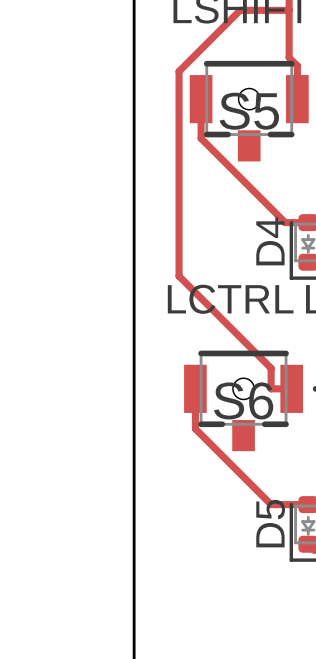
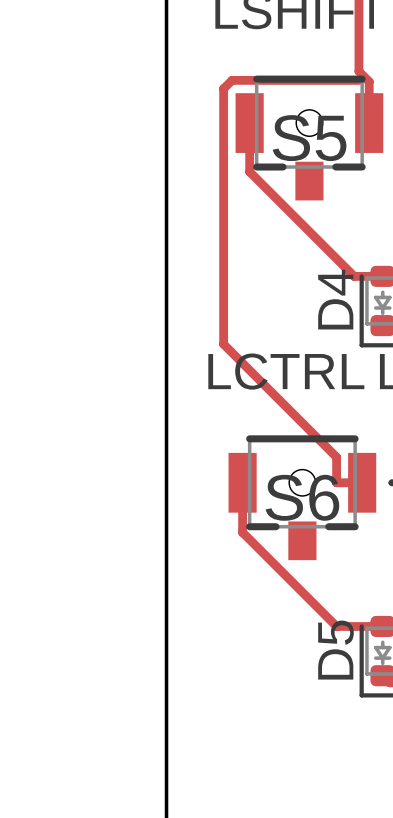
top track: (289, 10) (240, 10) (179, 71) (180, 277) -> (358, 80) (231, 80) (223, 88) (223, 344)

